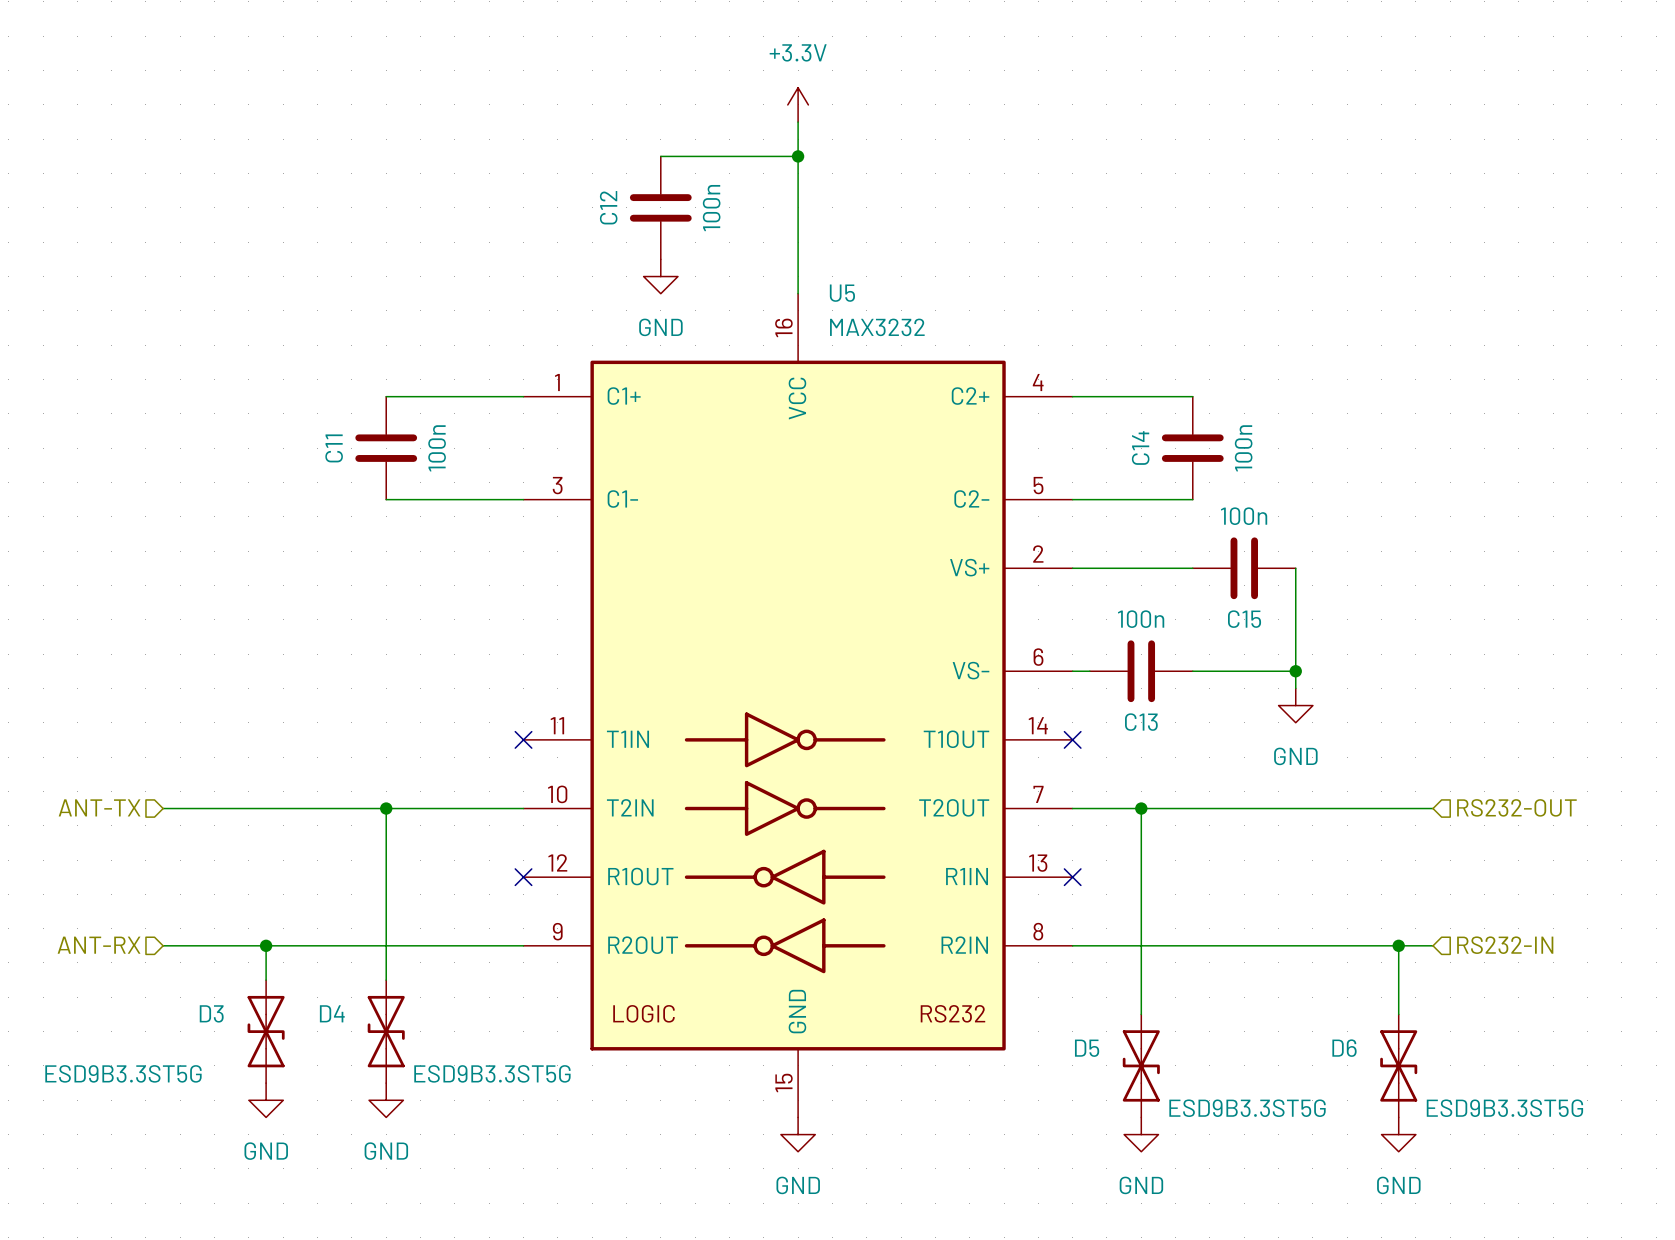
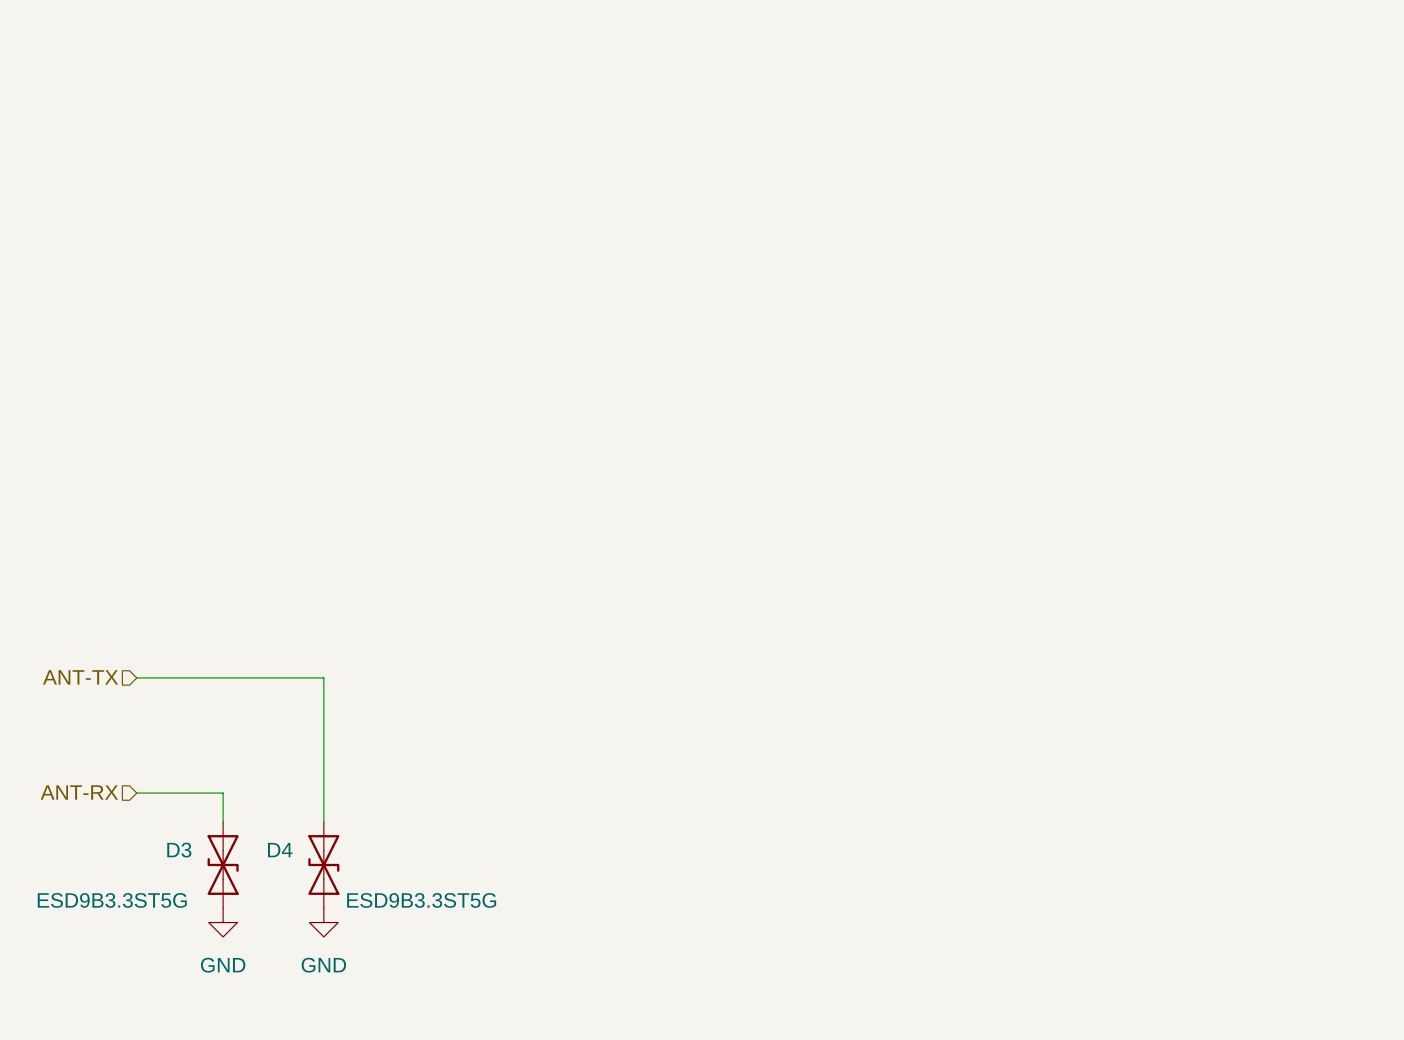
power symbol: +3.3V (798, 104) -> none
wire: (798, 122) (798, 293) -> none
wire: (660, 156) (798, 156) -> none
junction: (798, 156) -> none
C12: 100n (660, 207) -> none
power symbol: GND (660, 276) -> none
wire: (386, 396) (523, 396) -> none
wire: (1072, 396) (1192, 396) -> none
C11: 100n (386, 448) -> none
C14: 100n (1192, 448) -> none
wire: (386, 499) (523, 499) -> none
wire: (1072, 499) (1192, 499) -> none
wire: (1072, 568) (1192, 568) -> none
C15: 100n (1244, 568) -> none
wire: (1295, 568) (1295, 688) -> none
wire: (1072, 671) (1089, 671) -> none
C13: 100n (1141, 671) -> none
wire: (1192, 671) (1295, 671) -> none
junction: (1295, 671) -> none
U5: MAX3232 (798, 705) -> none
power symbol: GND (1295, 705) -> none
no-connect mark: (523, 739) -> none
no-connect mark: (1072, 739) -> none
hierarchical label: RS232-OUT (1516, 807) -> none
wire: (386, 808) (523, 808) -> none
junction: (386, 808) -> none
wire: (1072, 808) (1433, 808) -> none
wire: (1141, 808) (1141, 1014) -> none
junction: (1141, 808) -> none
no-connect mark: (523, 877) -> none
no-connect mark: (1072, 877) -> none
wire: (266, 945) (523, 945) -> none
junction: (266, 945) -> none
wire: (1072, 945) (1433, 945) -> none
wire: (1398, 945) (1398, 1014) -> none
junction: (1398, 945) -> none
hierarchical label: RS232-IN (1505, 945) -> none
D5: ESD9B3.3ST5G (1141, 1065) -> none
D6: ESD9B3.3ST5G (1398, 1065) -> none
power symbol: GND (798, 1134) -> none
power symbol: GND (1141, 1134) -> none
power symbol: GND (1398, 1134) -> none

